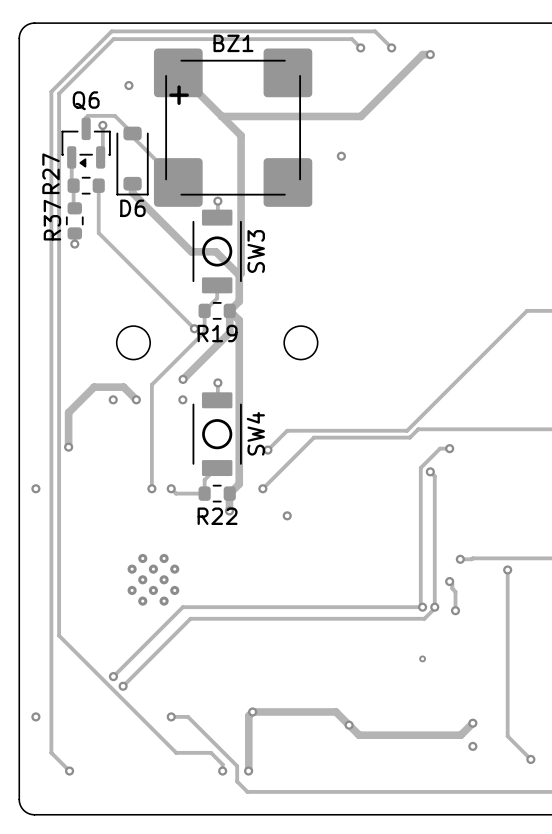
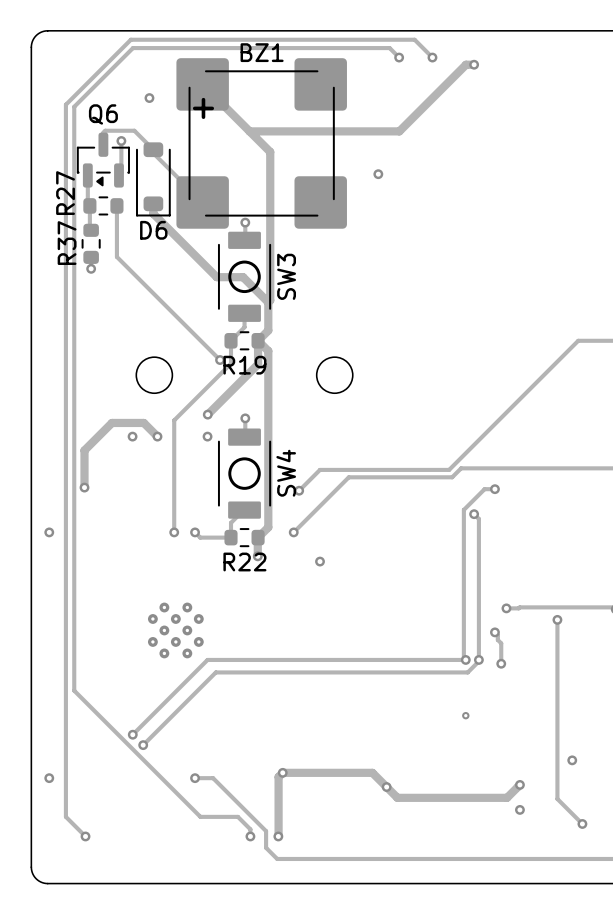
via: none -> (572, 760)

